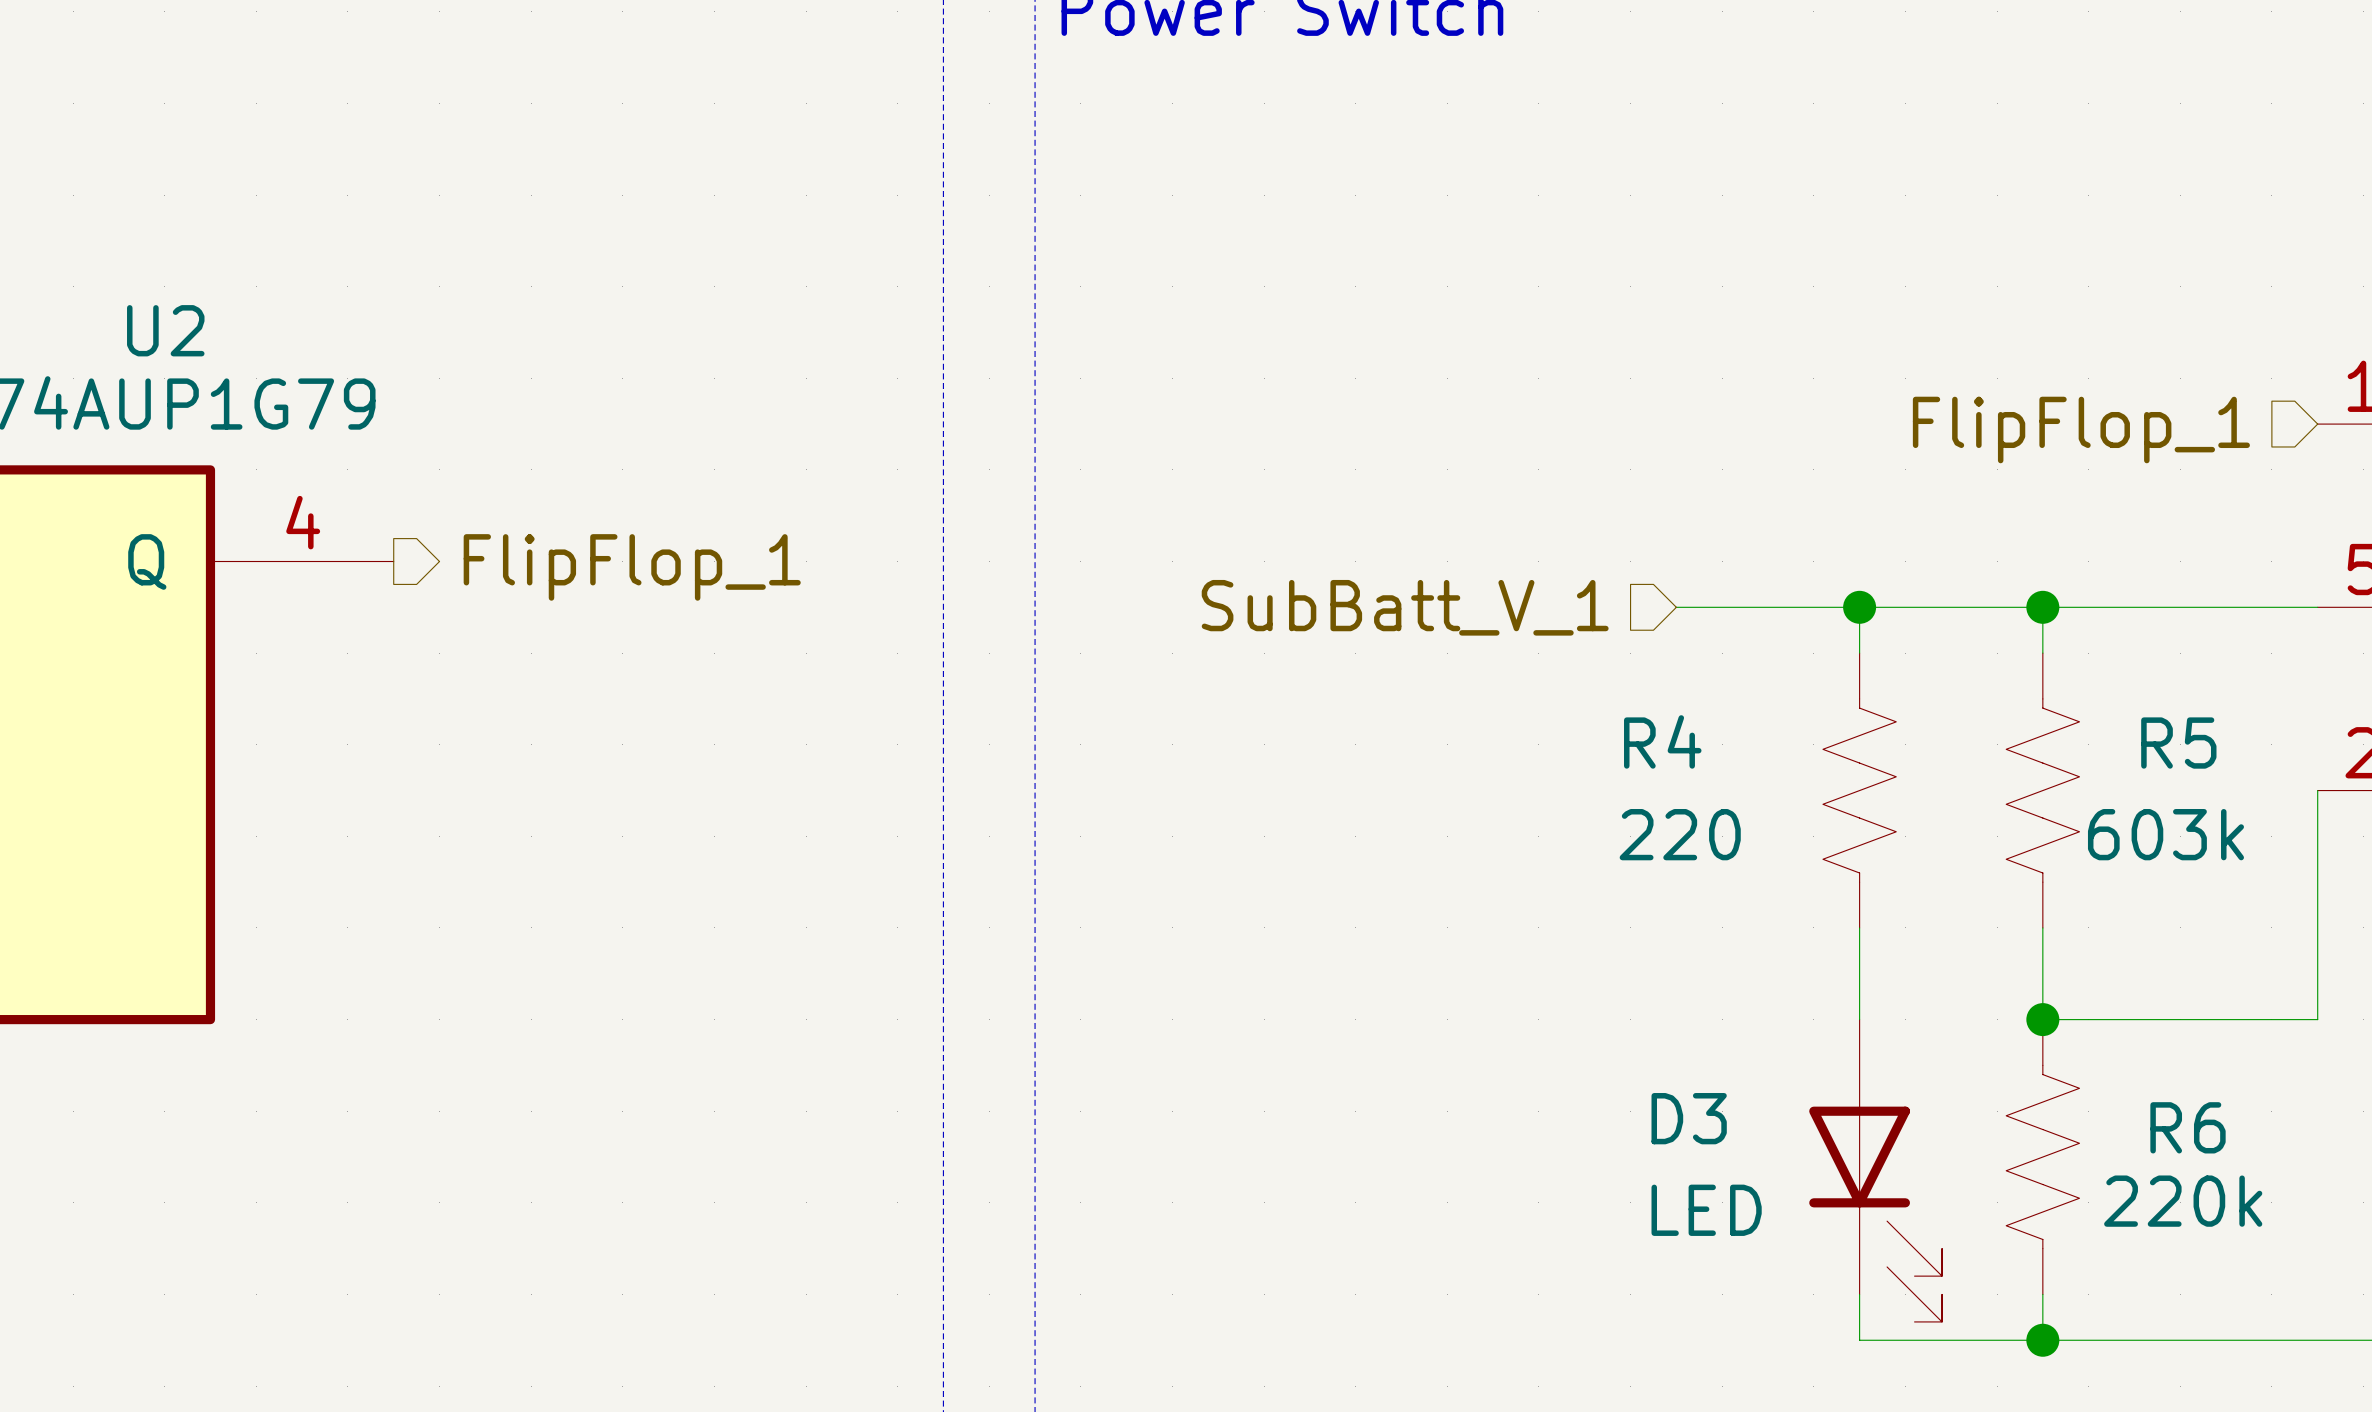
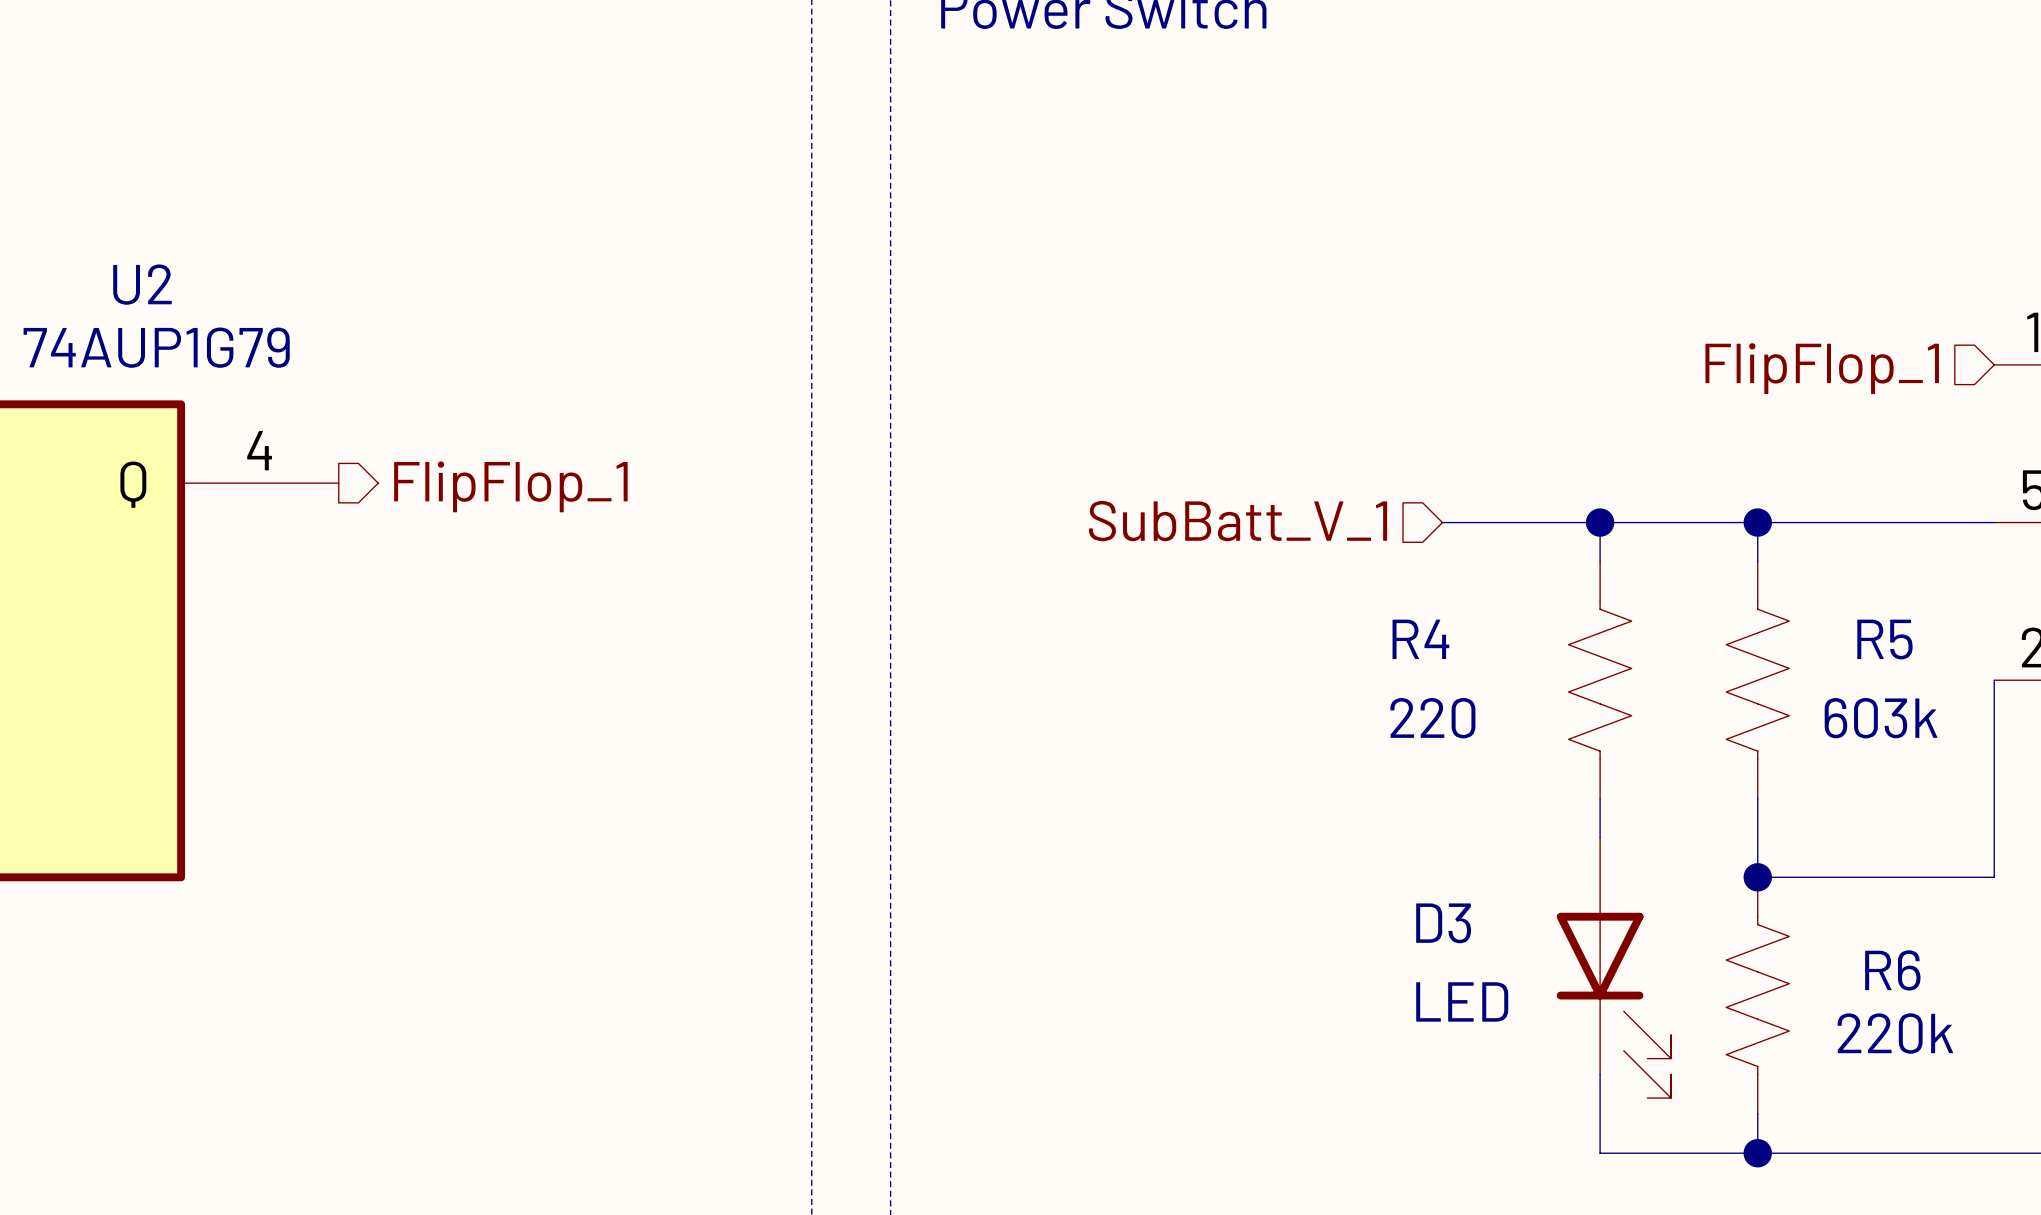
D3 position: (1875, 1170) -> (1613, 967)

